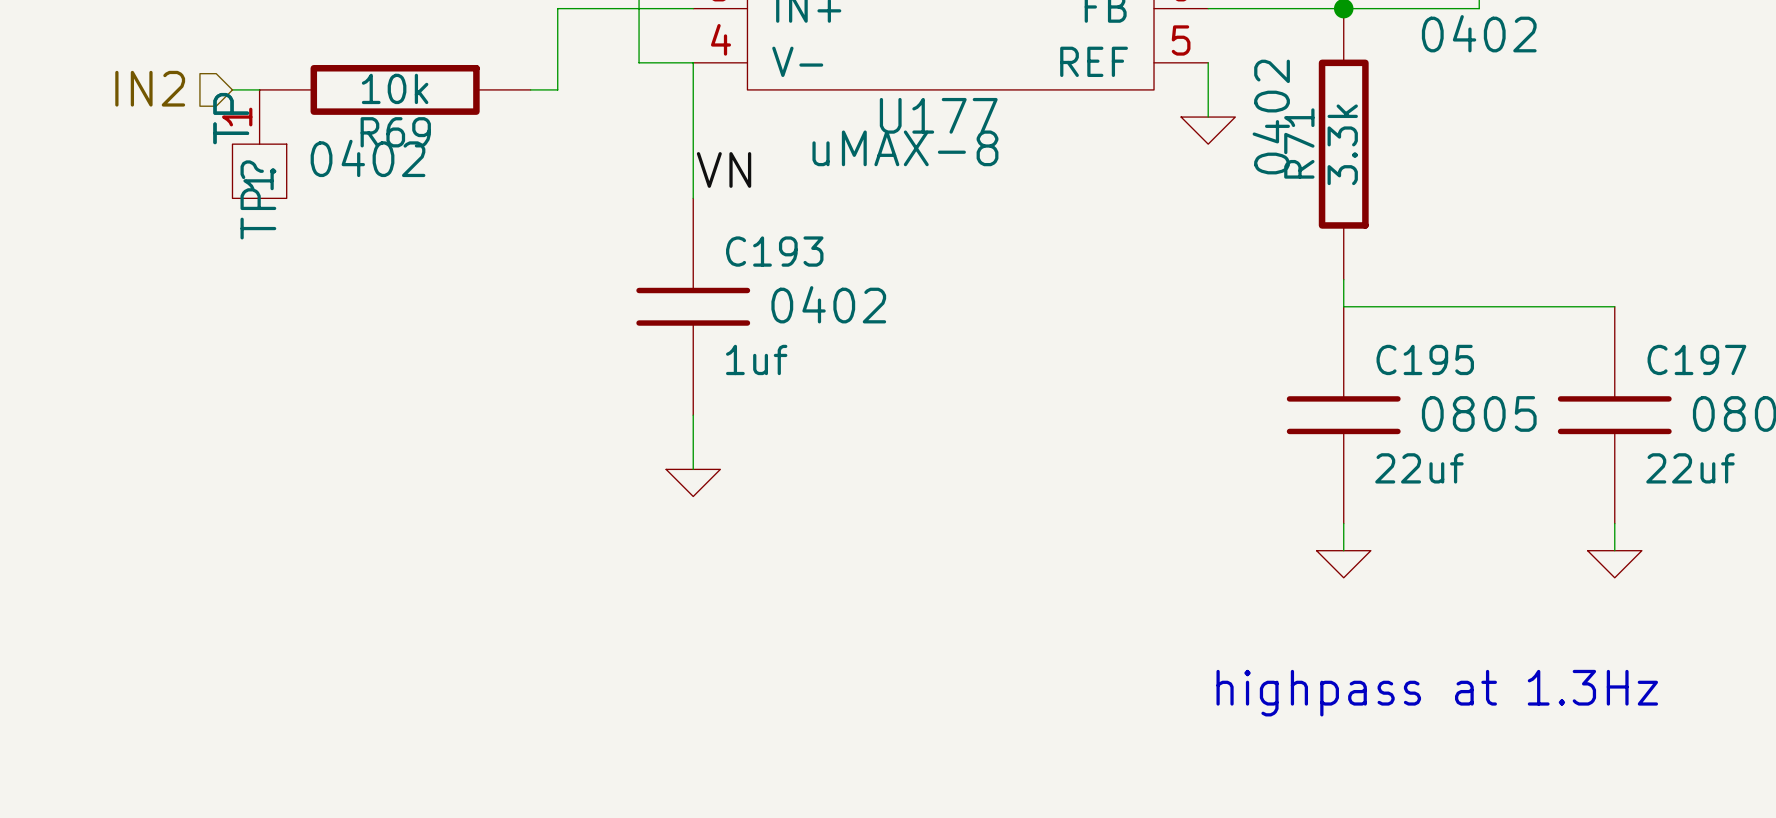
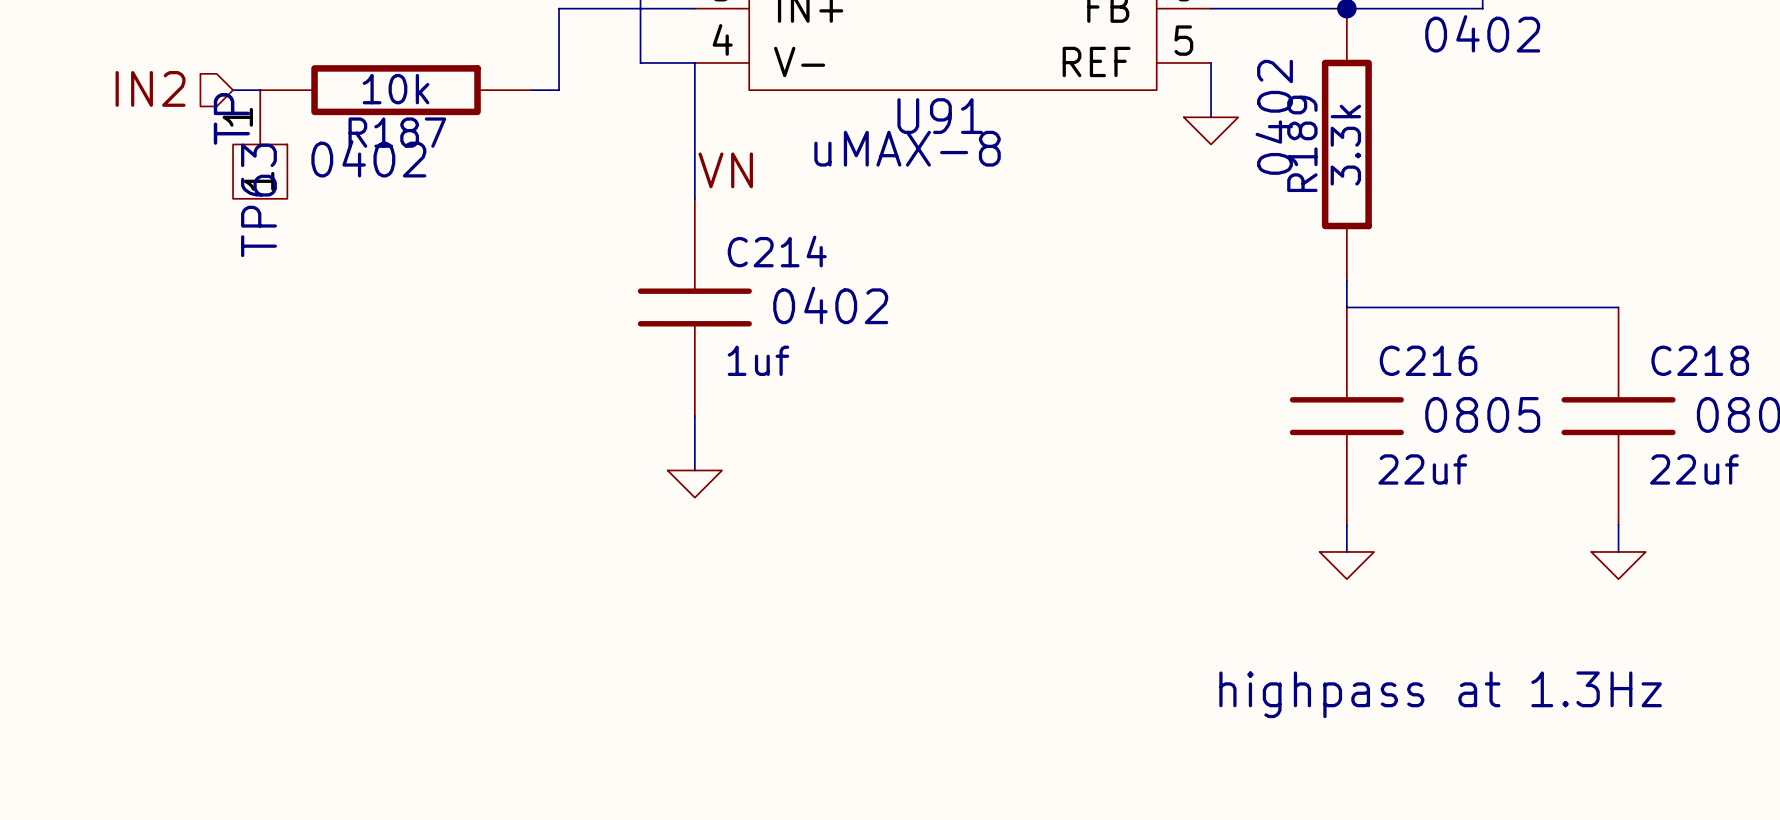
U177 name: U177 (938, 115) -> U91 (940, 116)
R69 name: R69 (395, 132) -> R187 (397, 132)
R71 name: R71 (1299, 143) -> R189 (1302, 143)
TP? name: TP? (258, 199) -> TP63 (258, 200)
C193 name: C193 (774, 251) -> C214 (777, 251)
C195 name: C195 (1425, 359) -> C216 (1428, 360)
C197 name: C197 (1696, 359) -> C218 (1700, 360)

